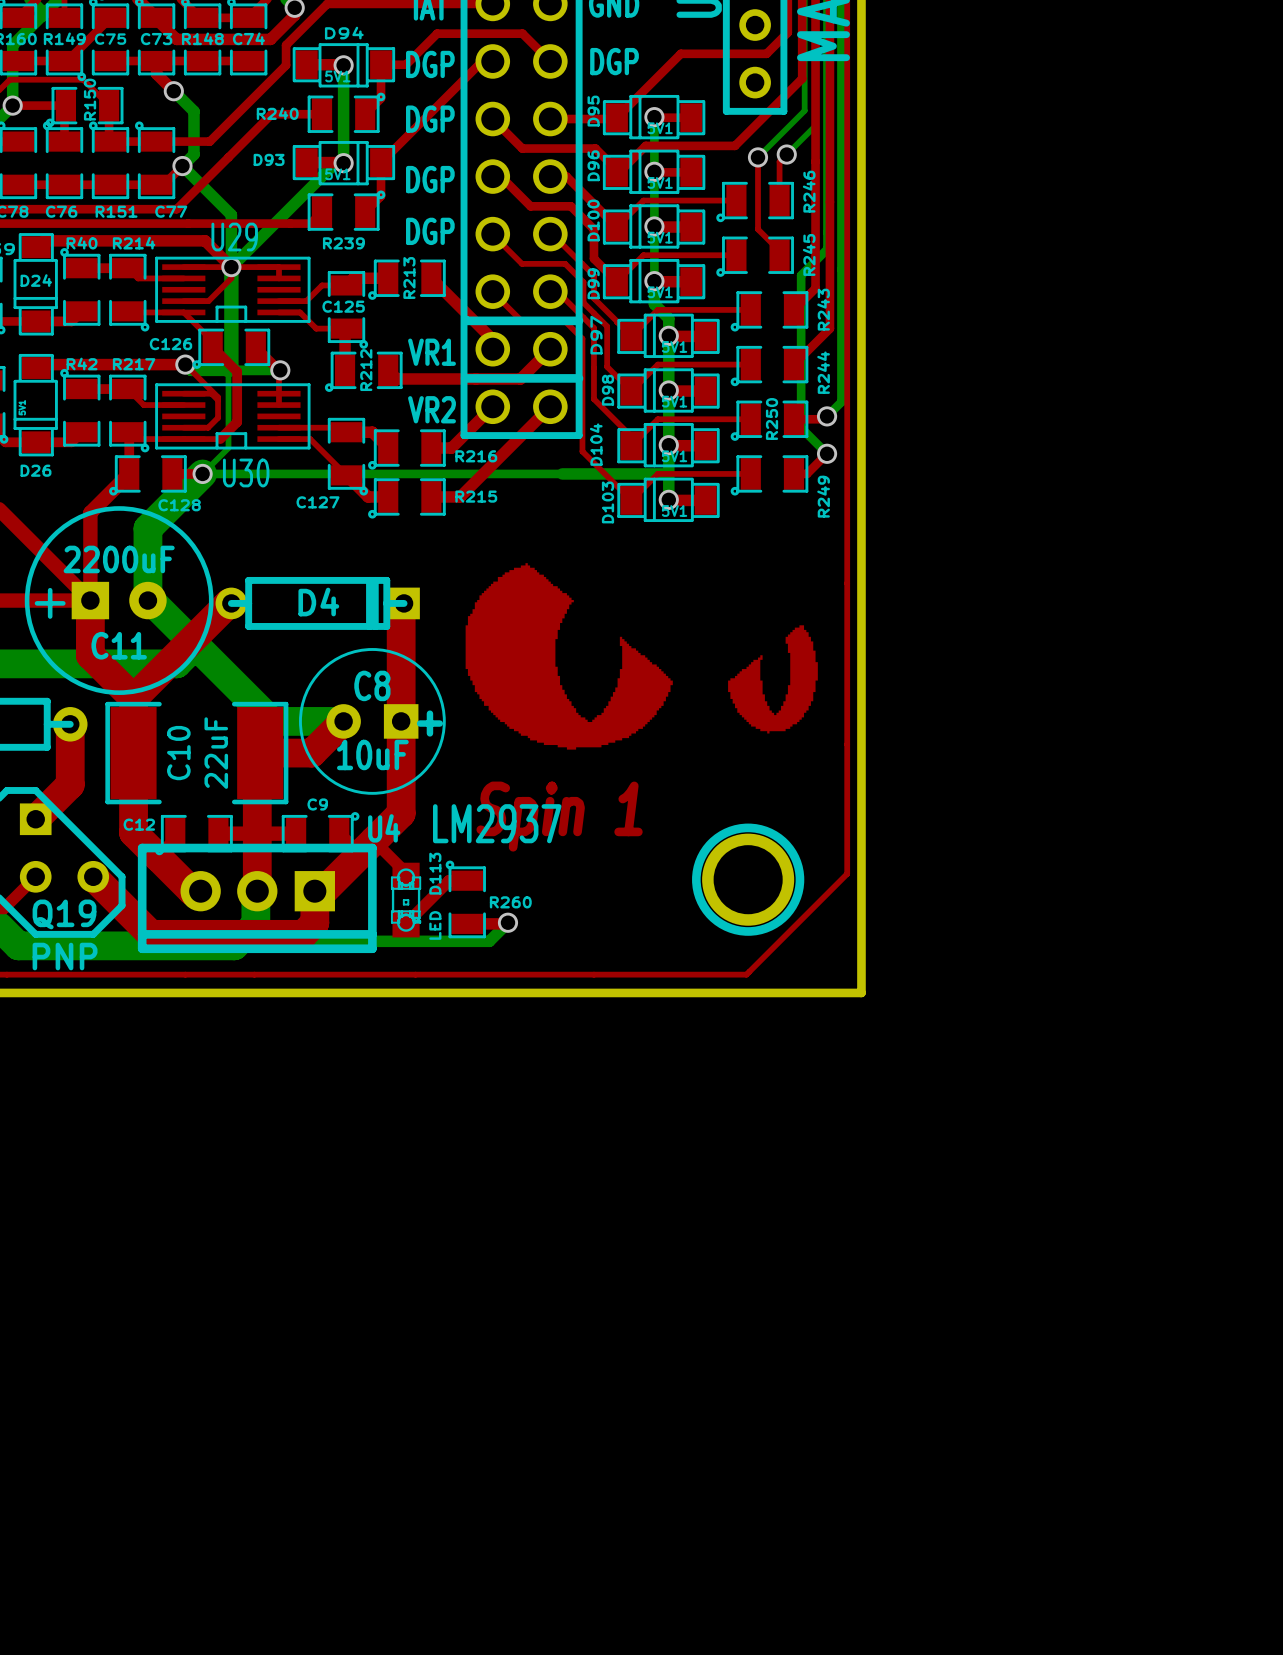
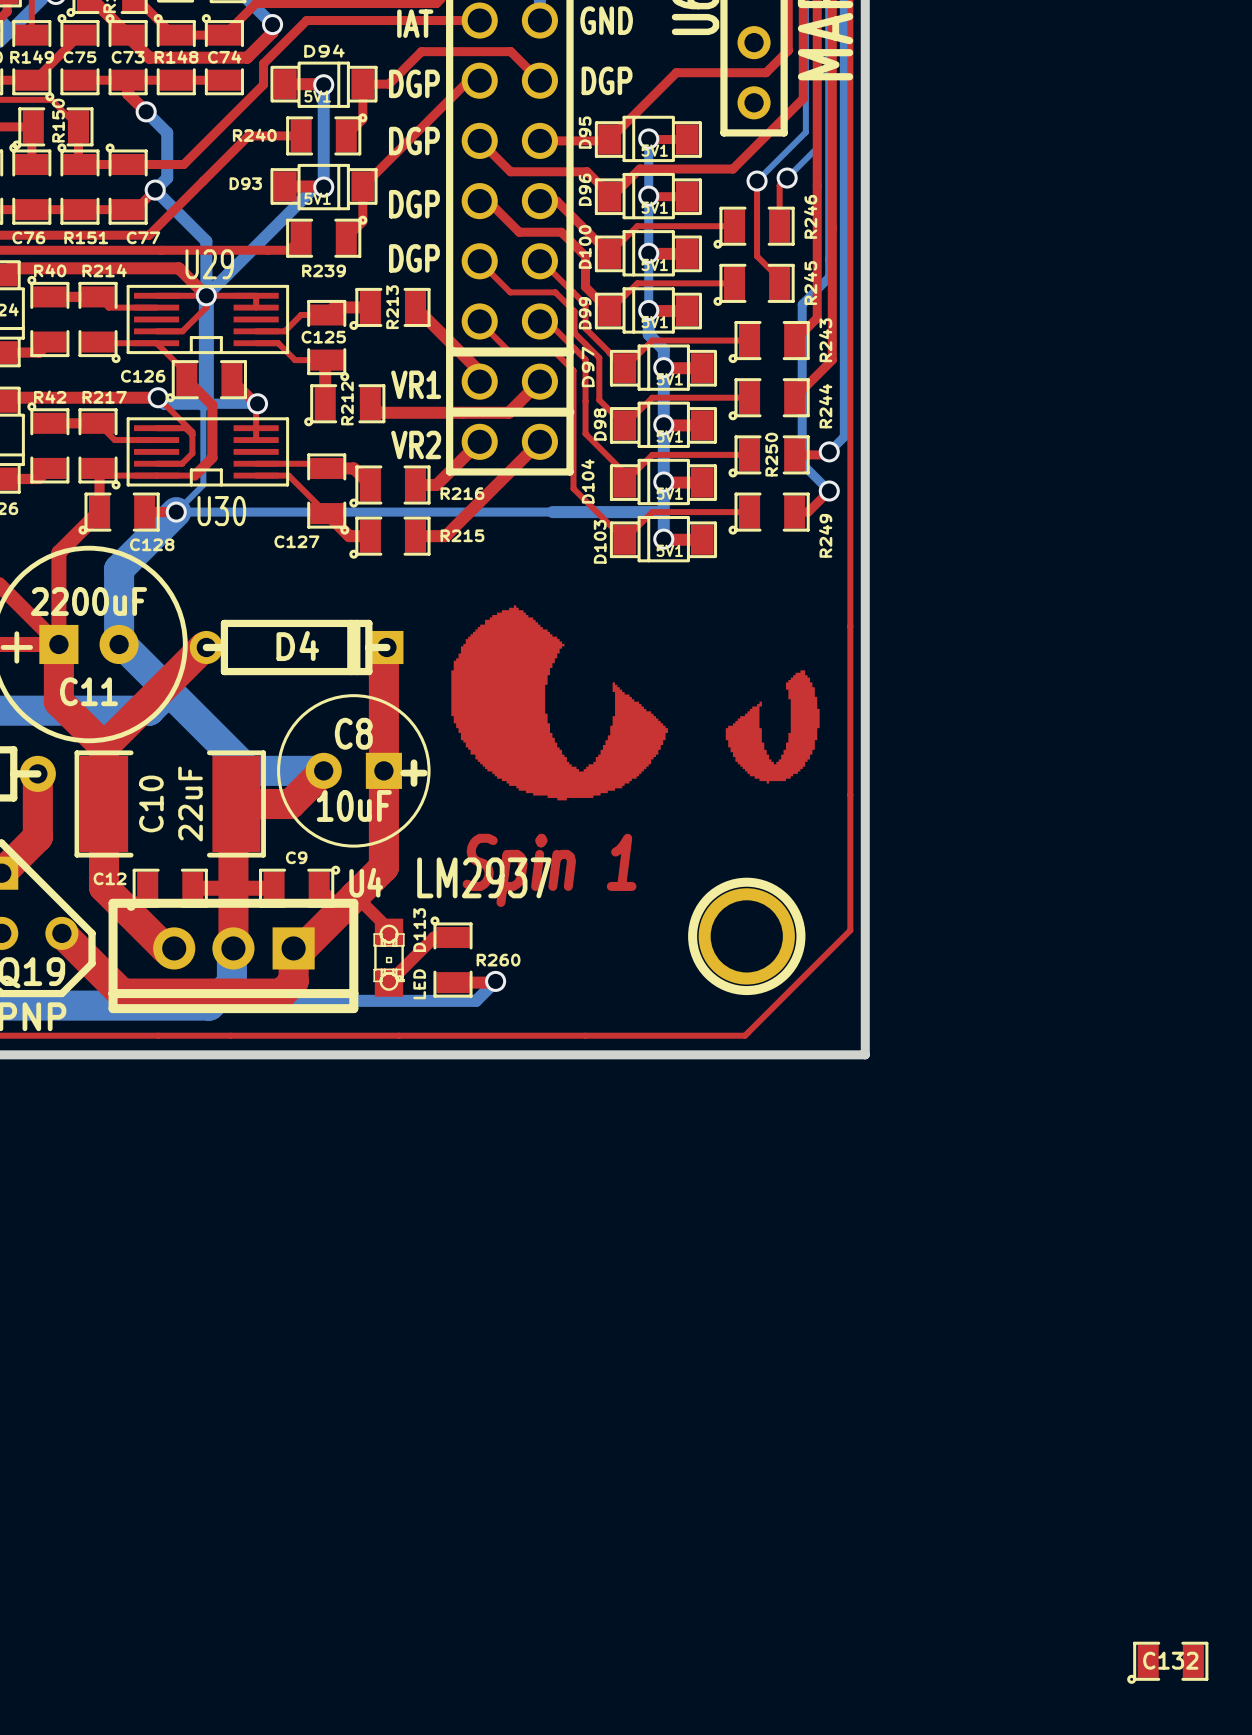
C132: none -> (1167, 1662)

